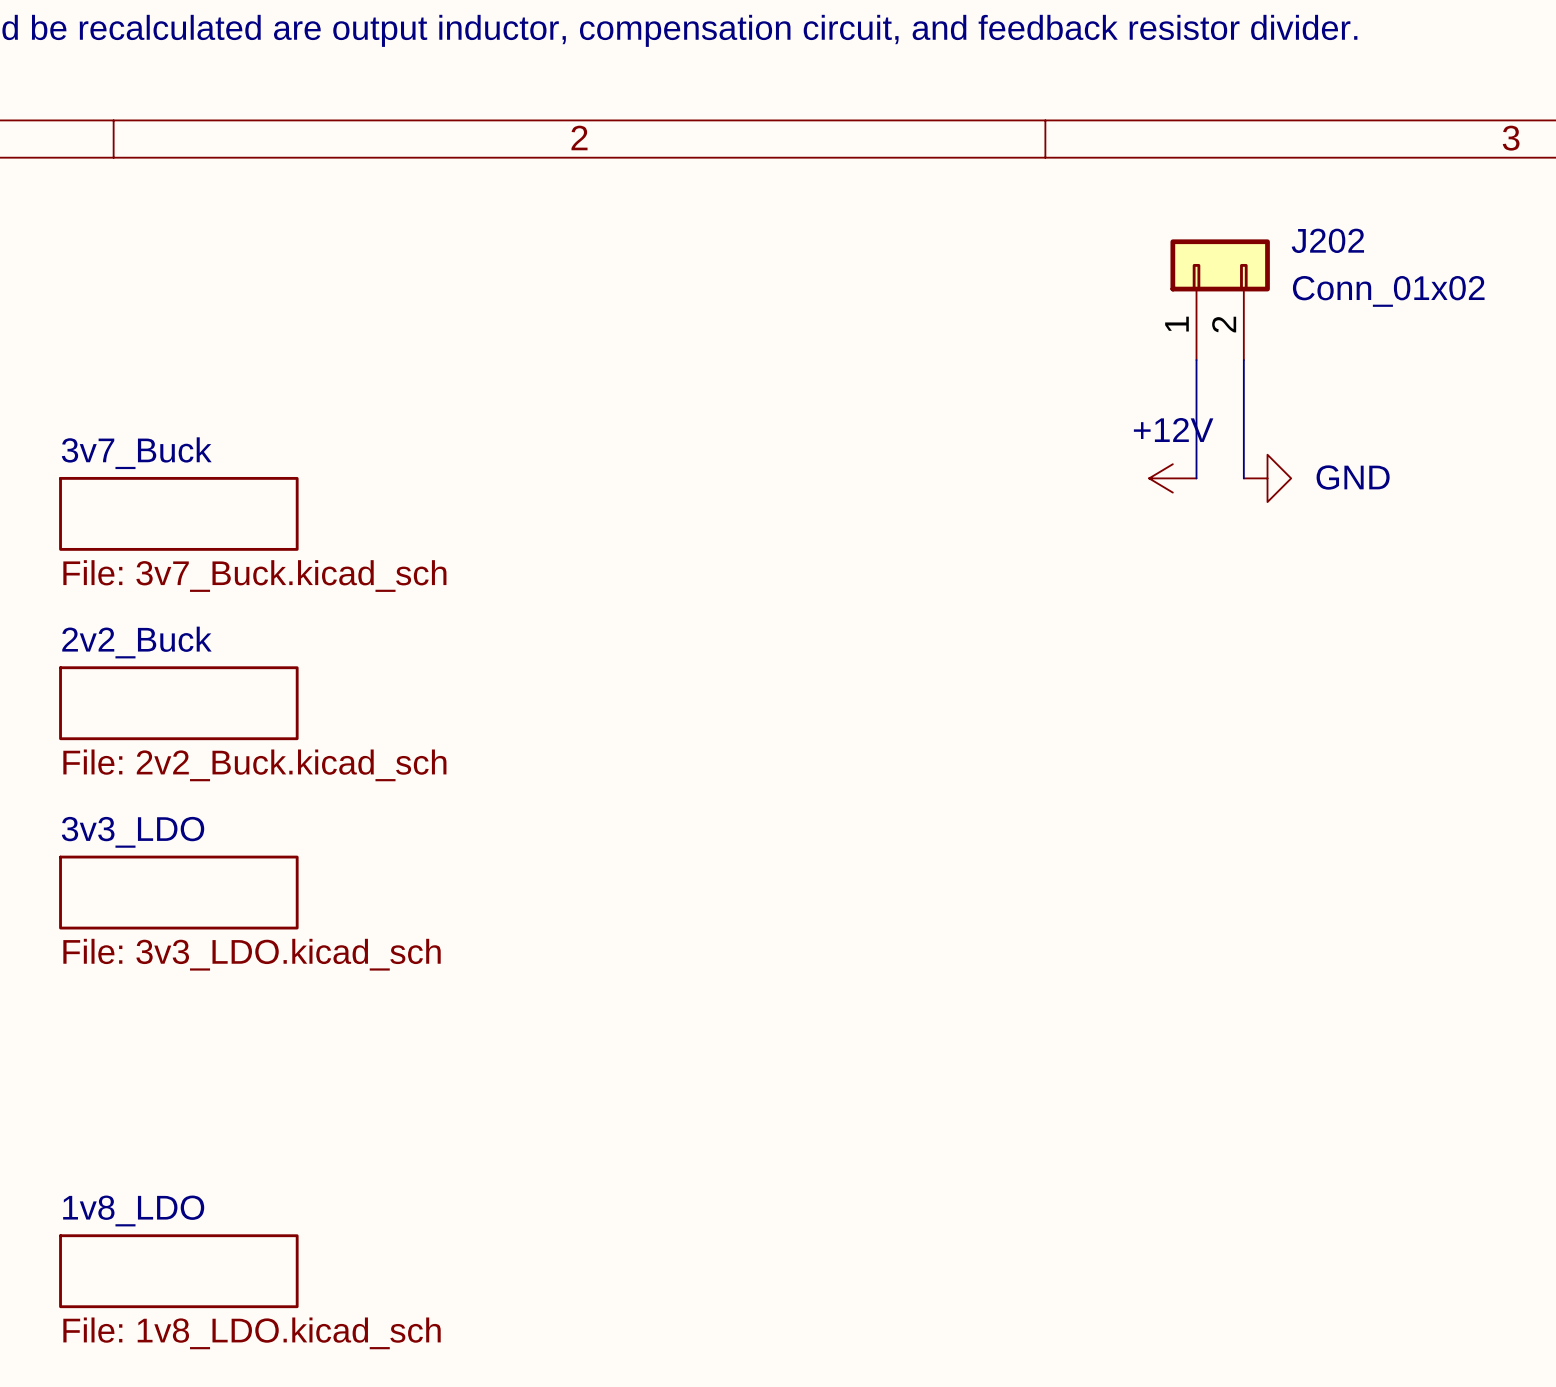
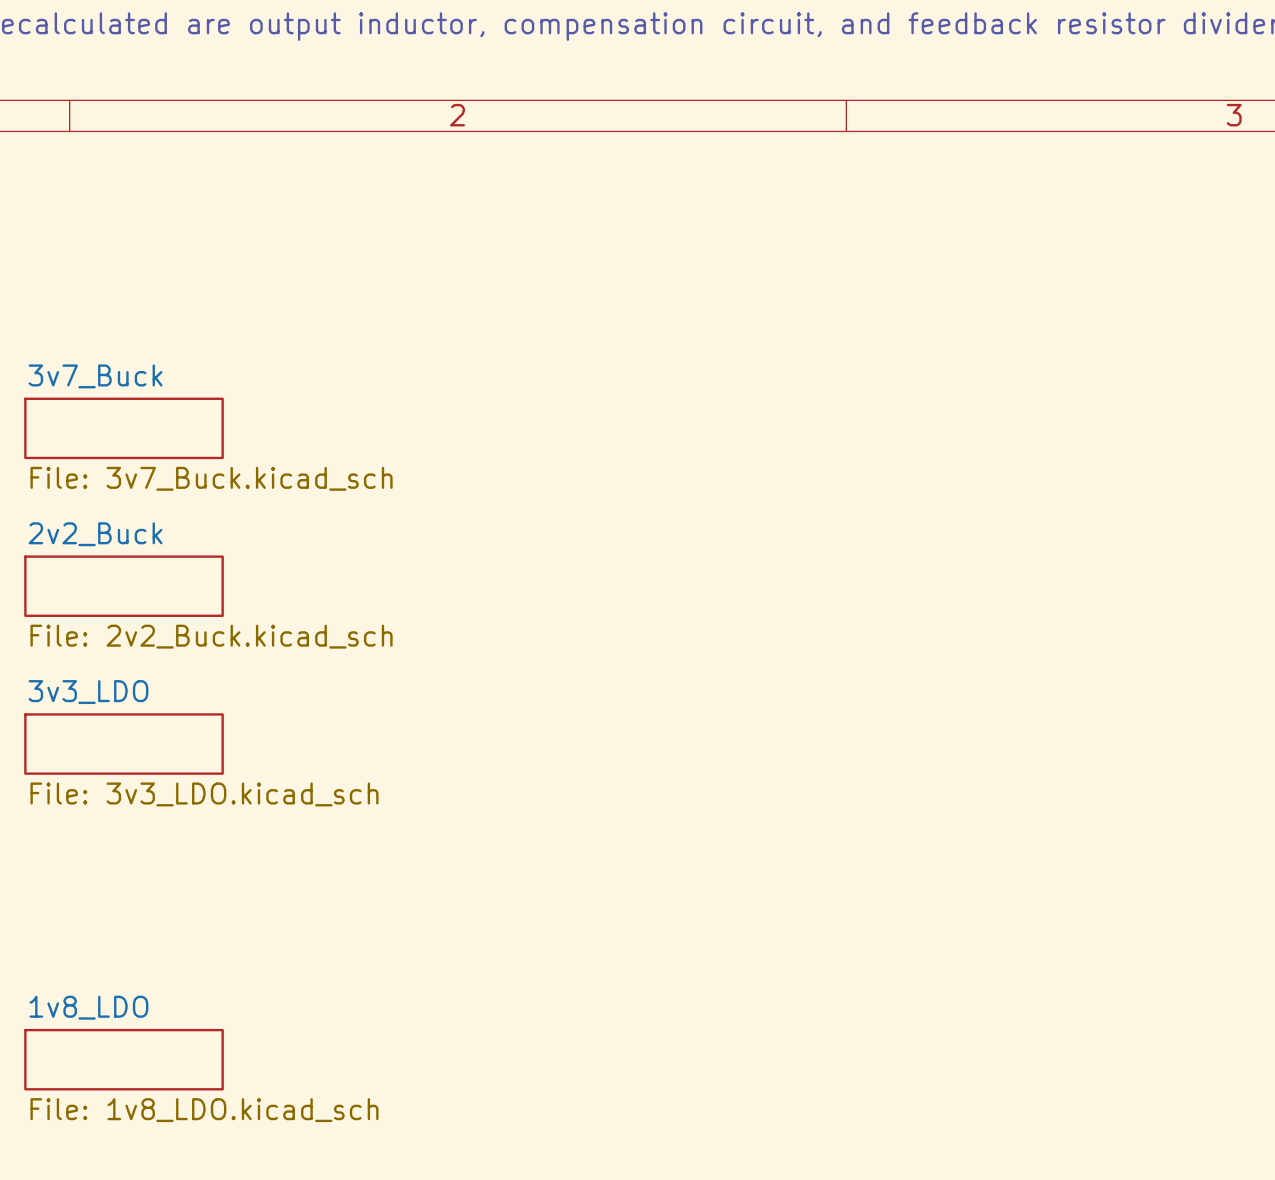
J202: Conn_01x02 (1220, 299) -> none
wire: (1196, 360) (1196, 478) -> none
wire: (1243, 360) (1243, 478) -> none
power symbol: +12V (1172, 478) -> none
power symbol: GND (1267, 478) -> none

